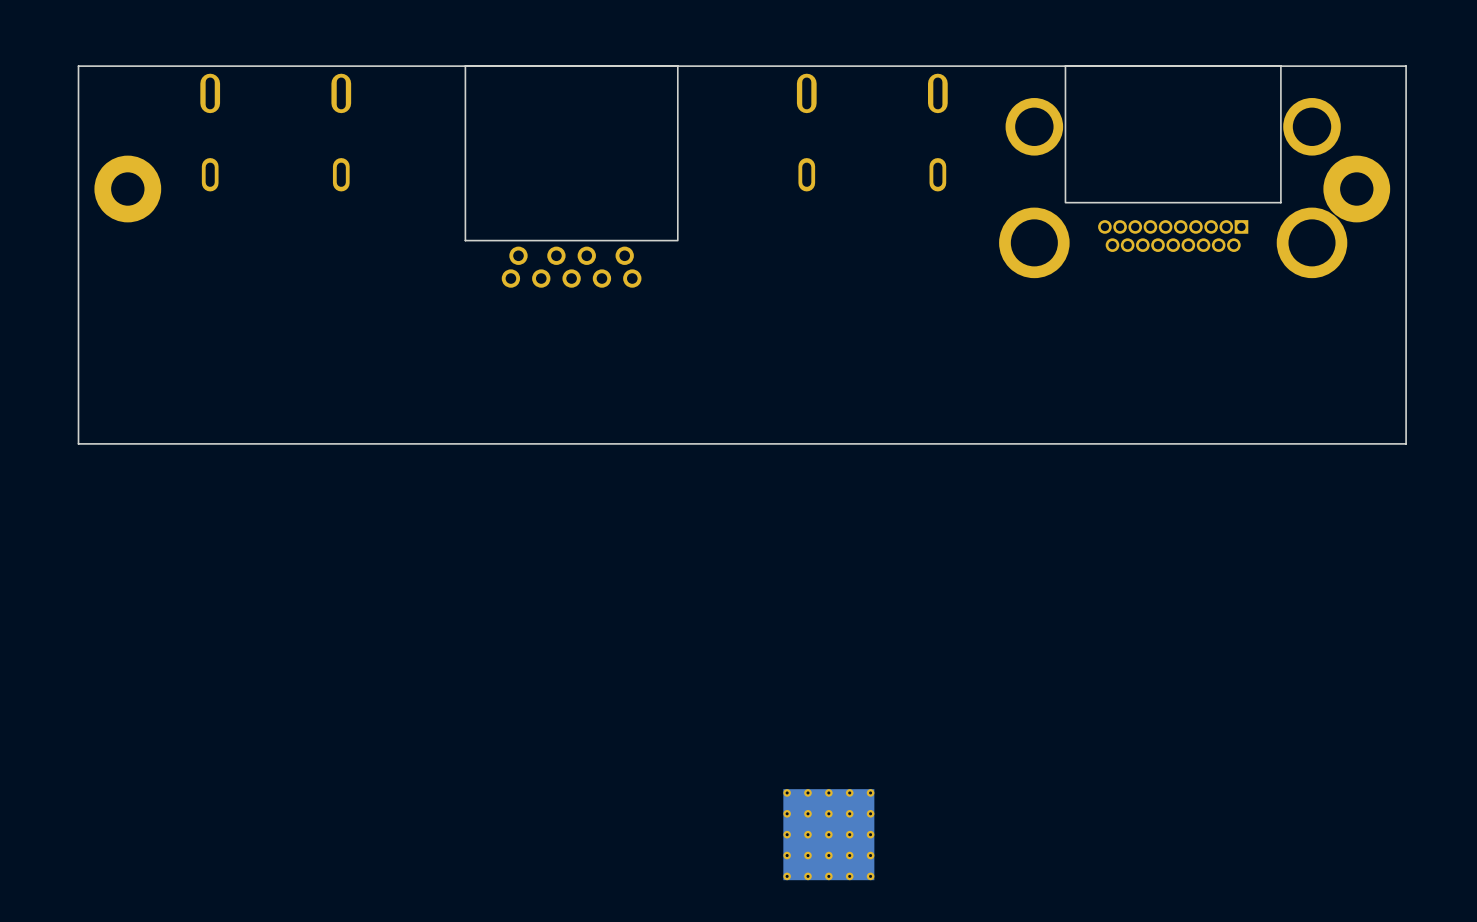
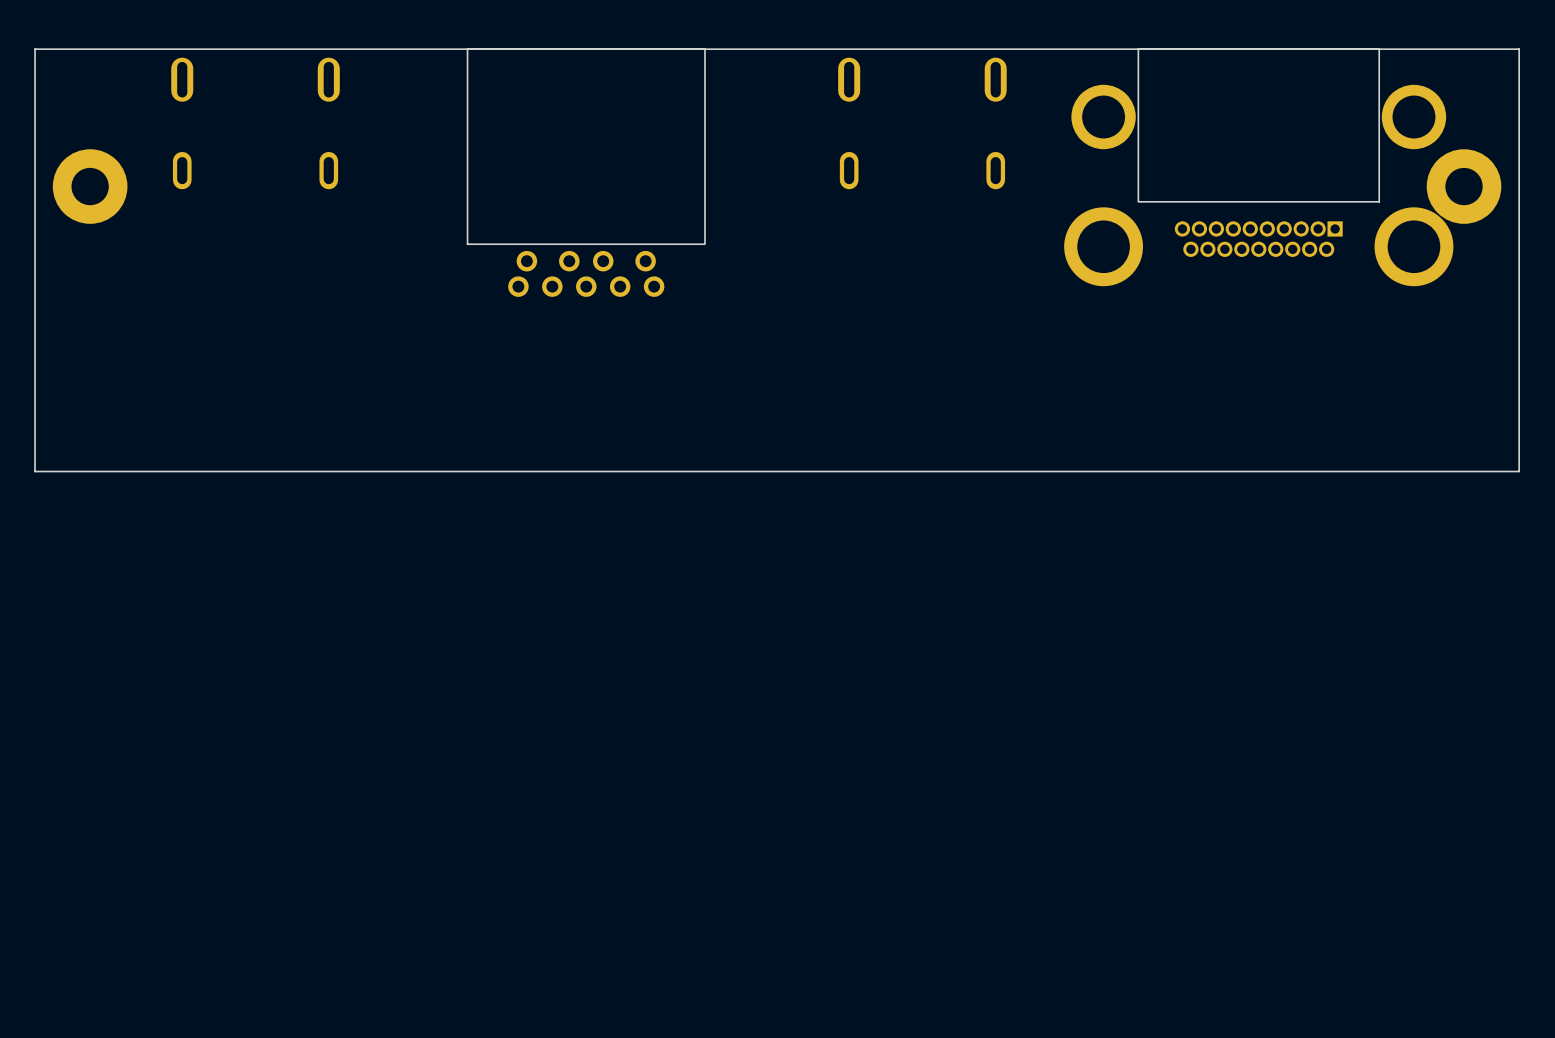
part: (828, 834) -> none

